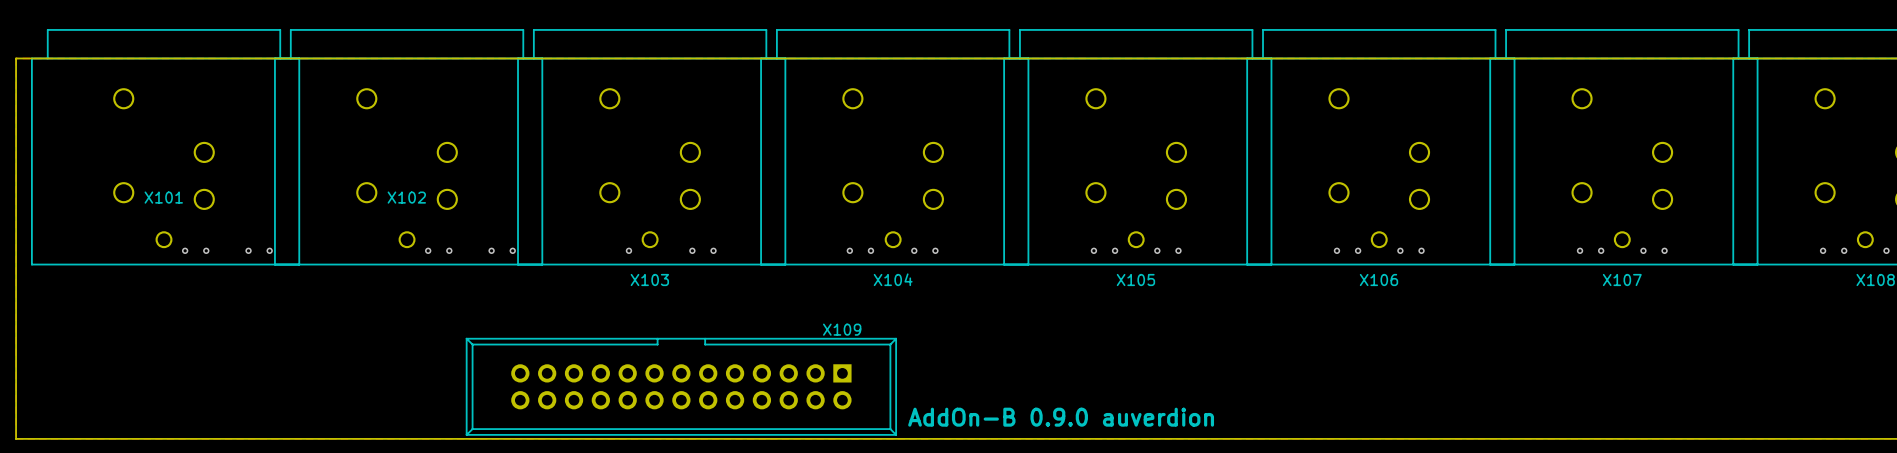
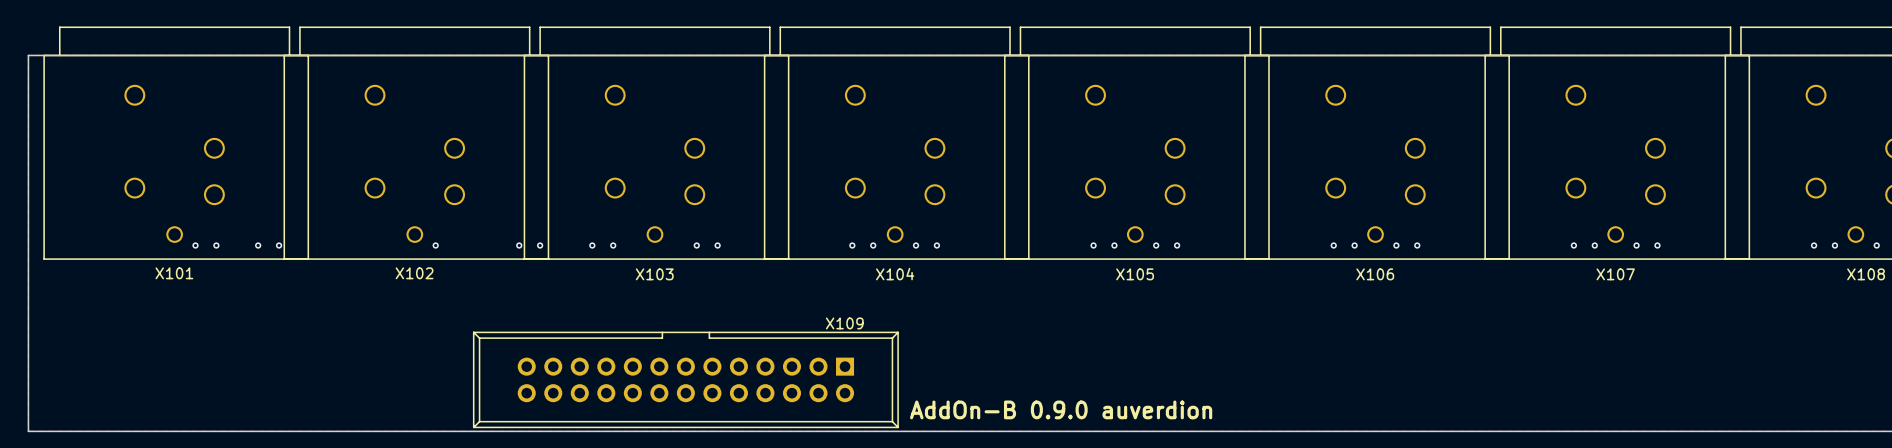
X101 name position: X101 (163, 197) -> X101 (174, 273)
X102 name position: X102 (406, 197) -> X102 (414, 273)
via: (449, 250) -> none
via: (491, 250) -> none
via: none -> (540, 245)
via: none -> (592, 245)
via: none -> (613, 245)
via: (628, 250) -> none

